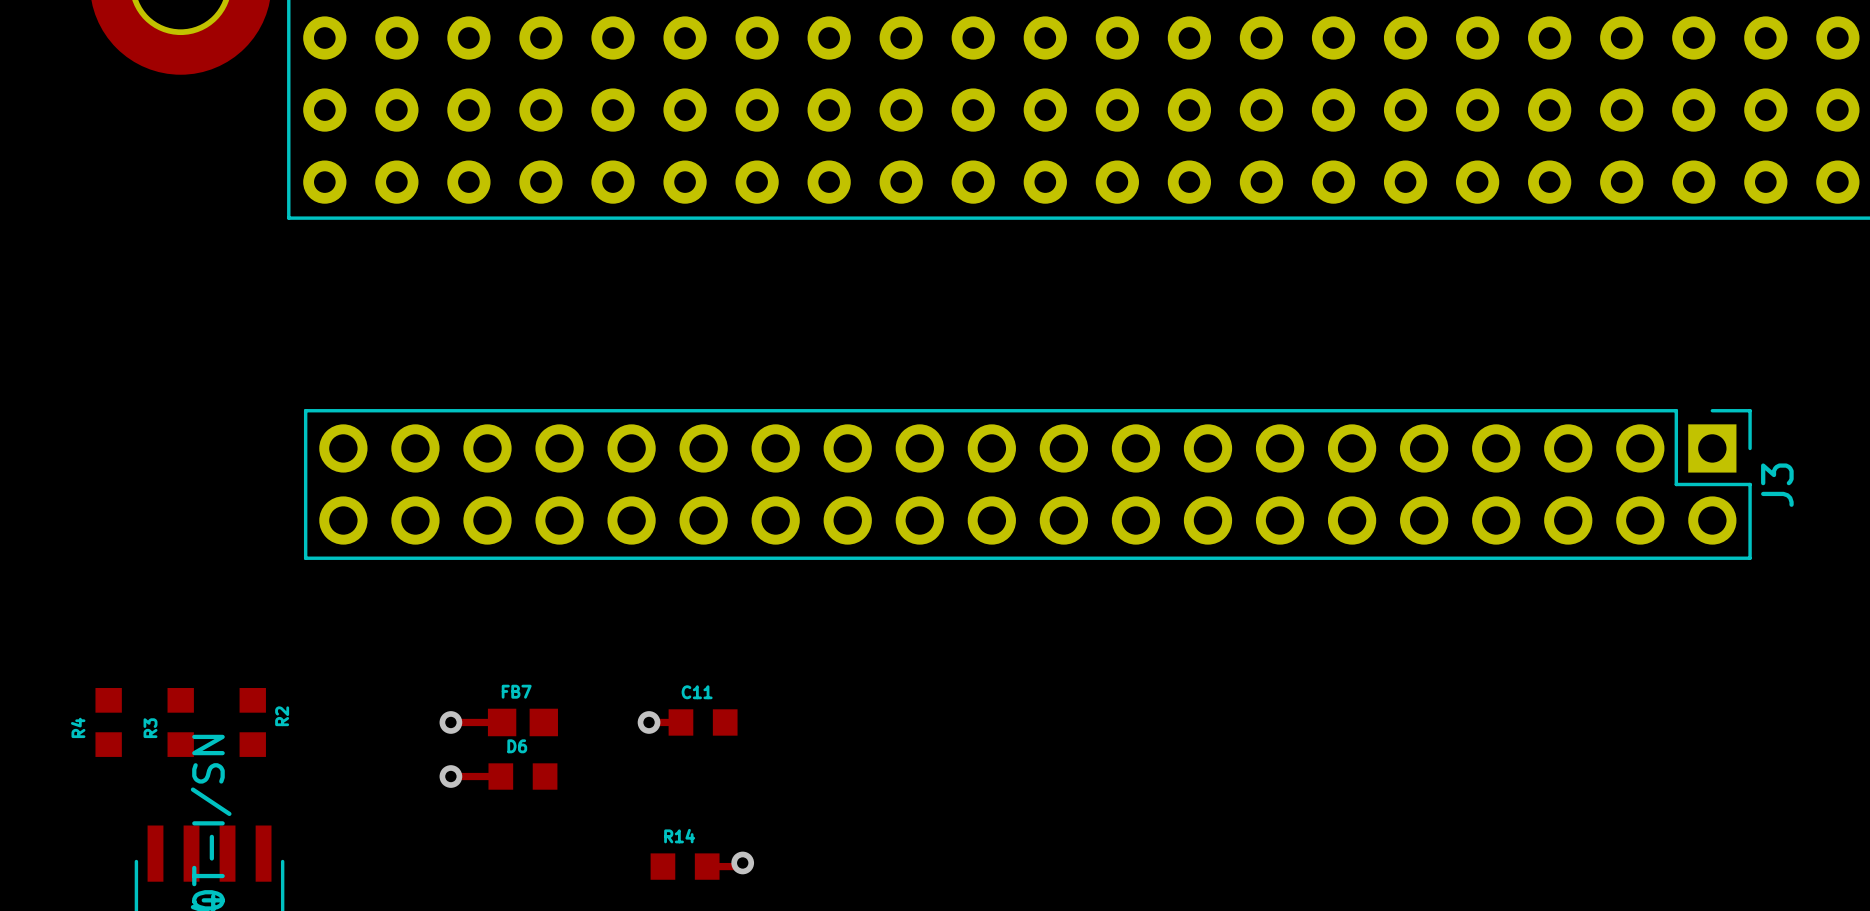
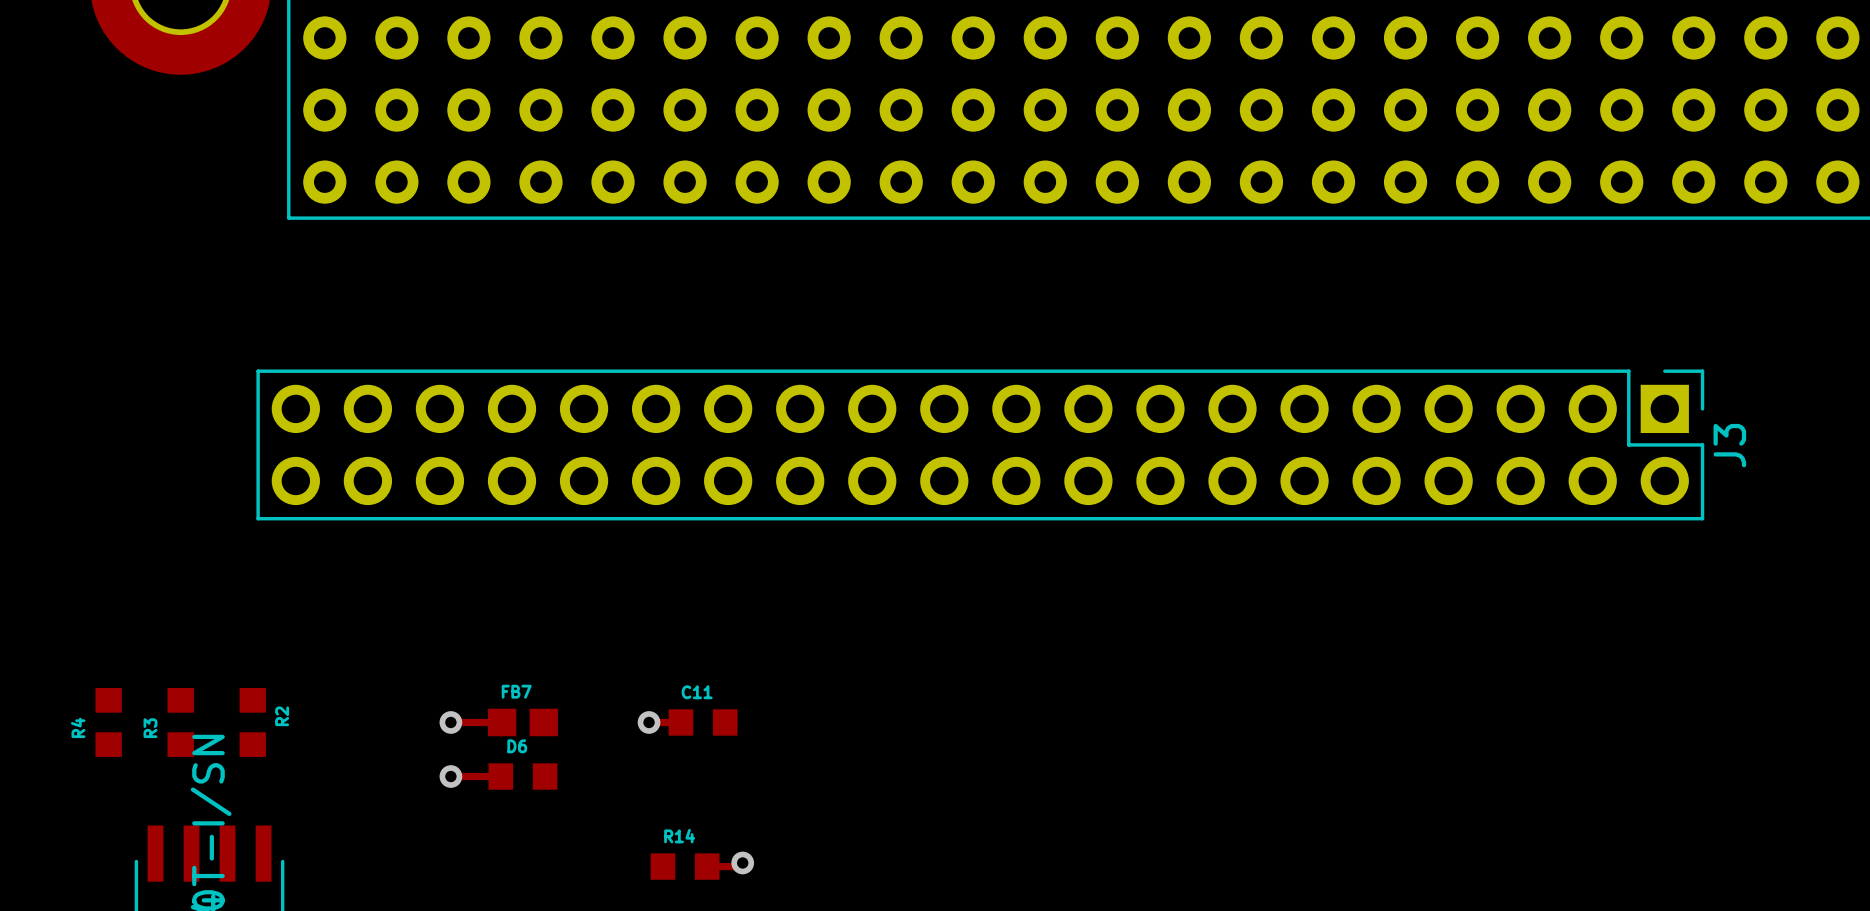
J3 position: (1027, 484) -> (980, 444)

